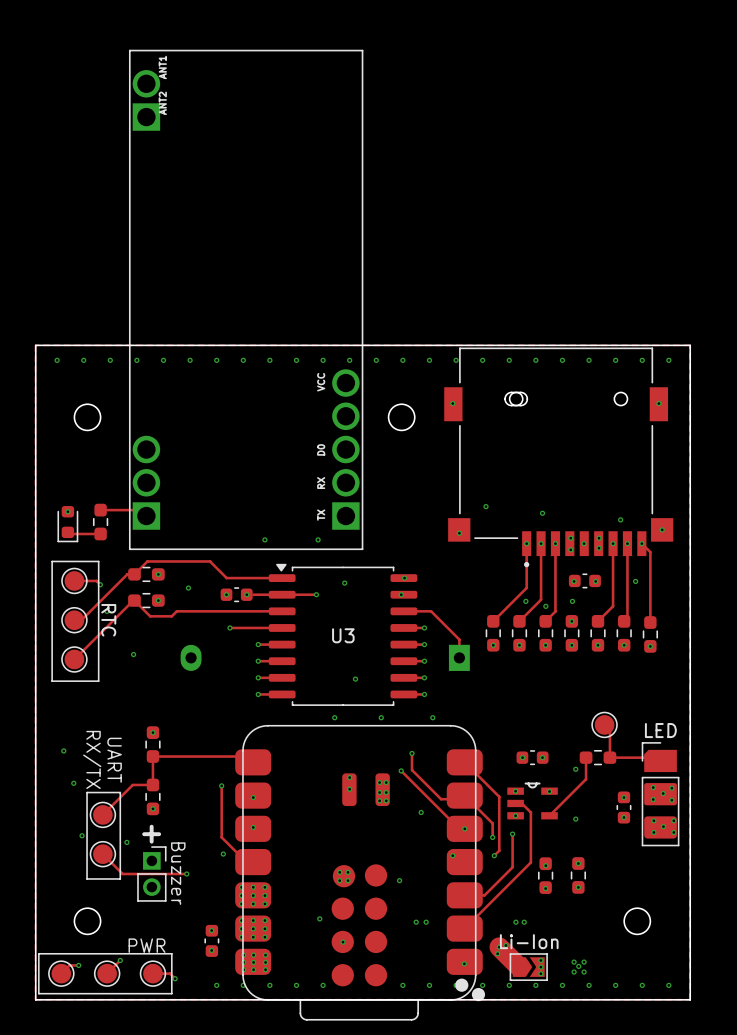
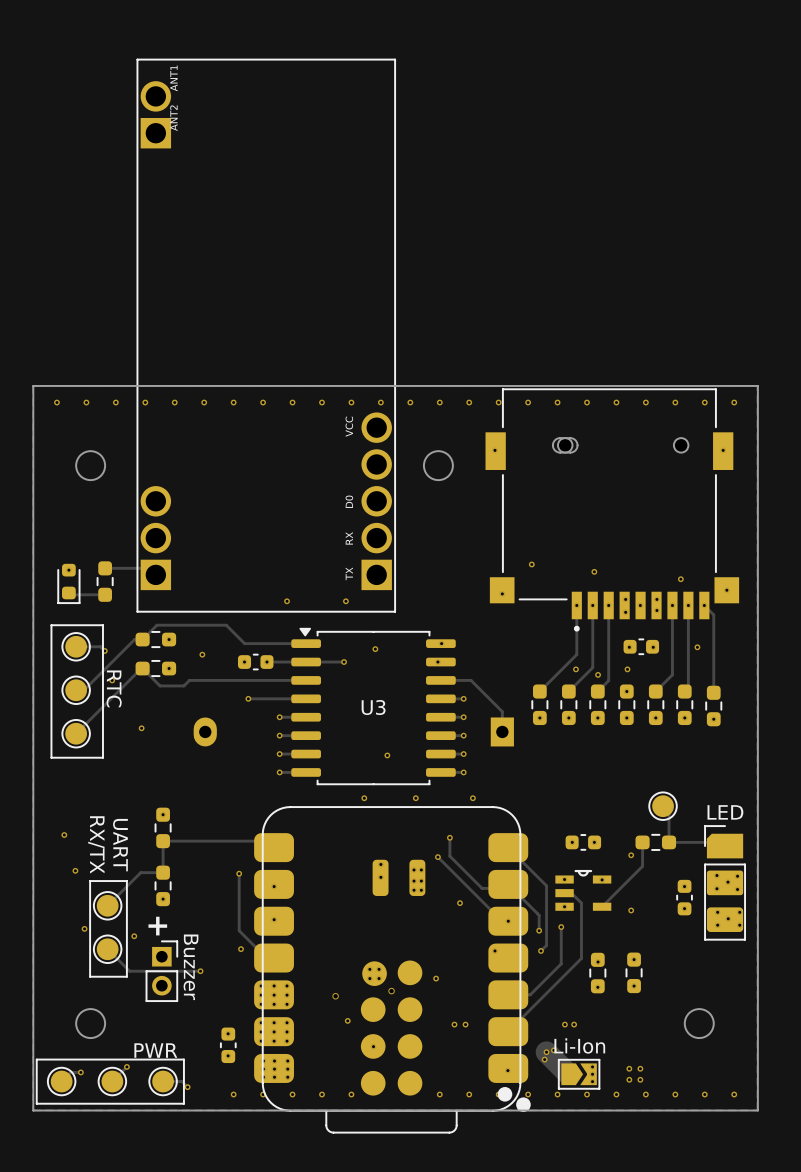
via: none -> (391, 991)
via: none -> (335, 996)
via: (578, 966) -> none

